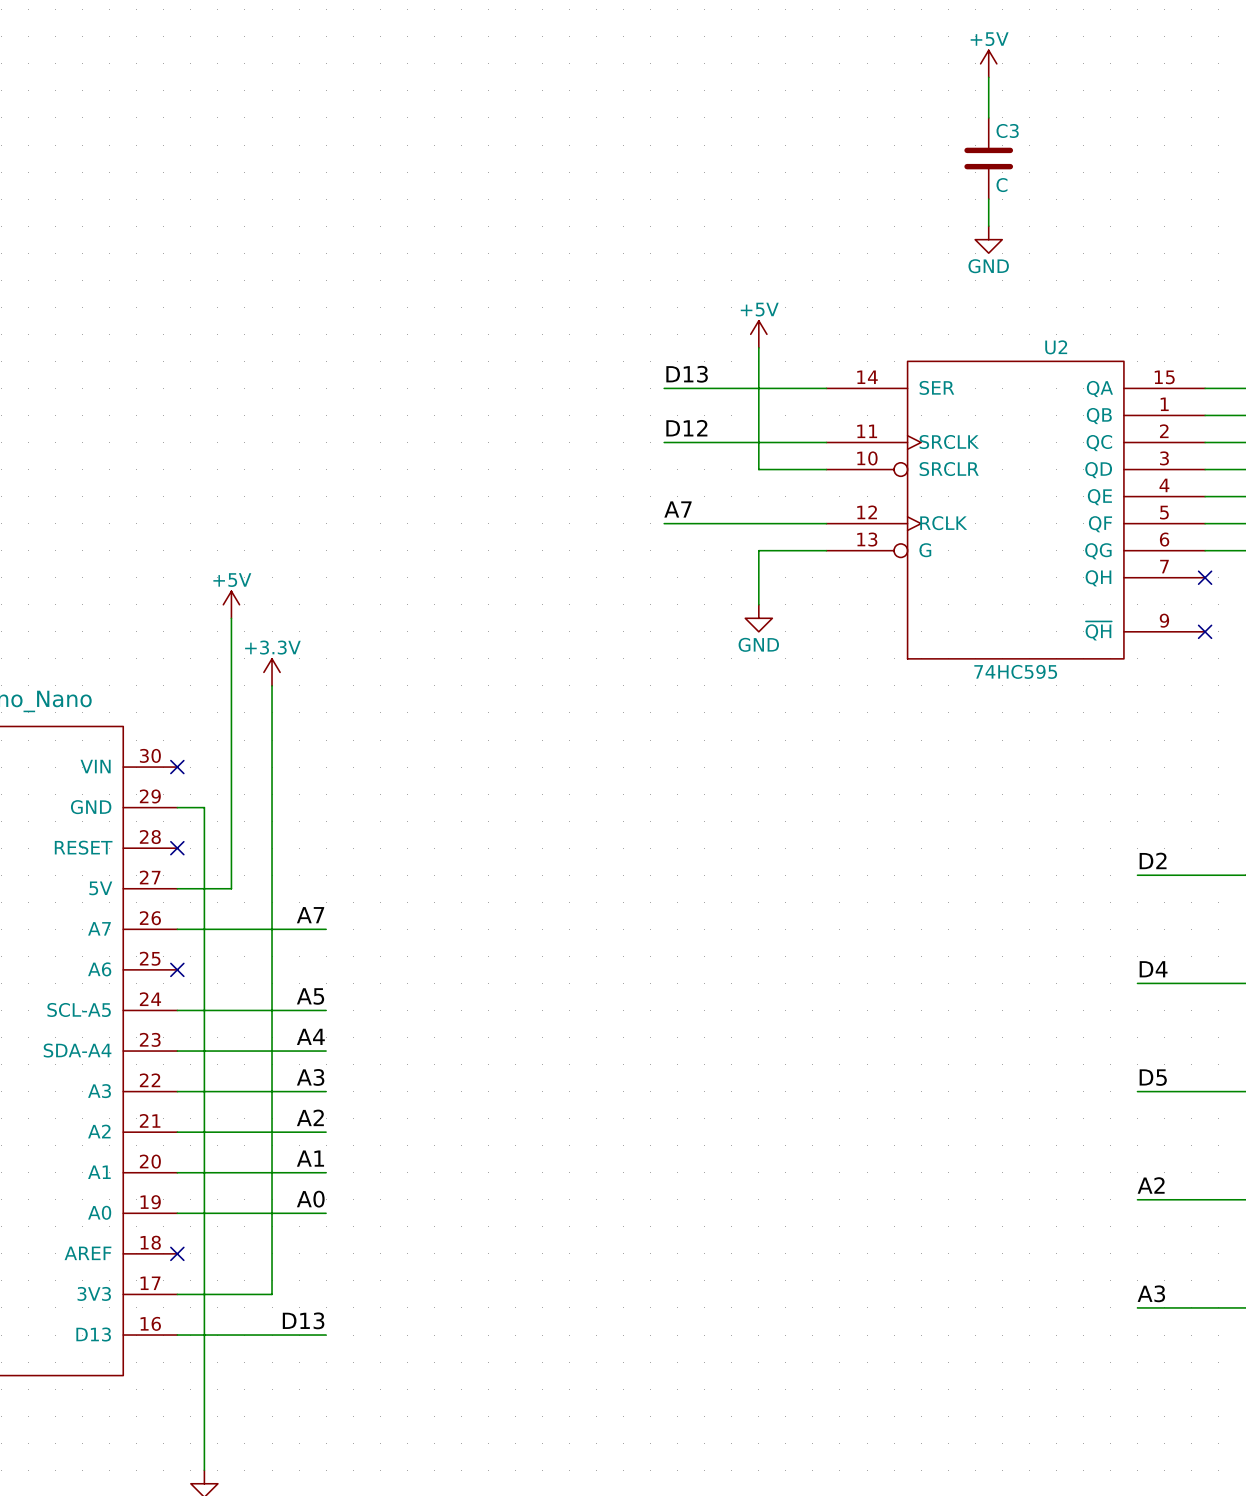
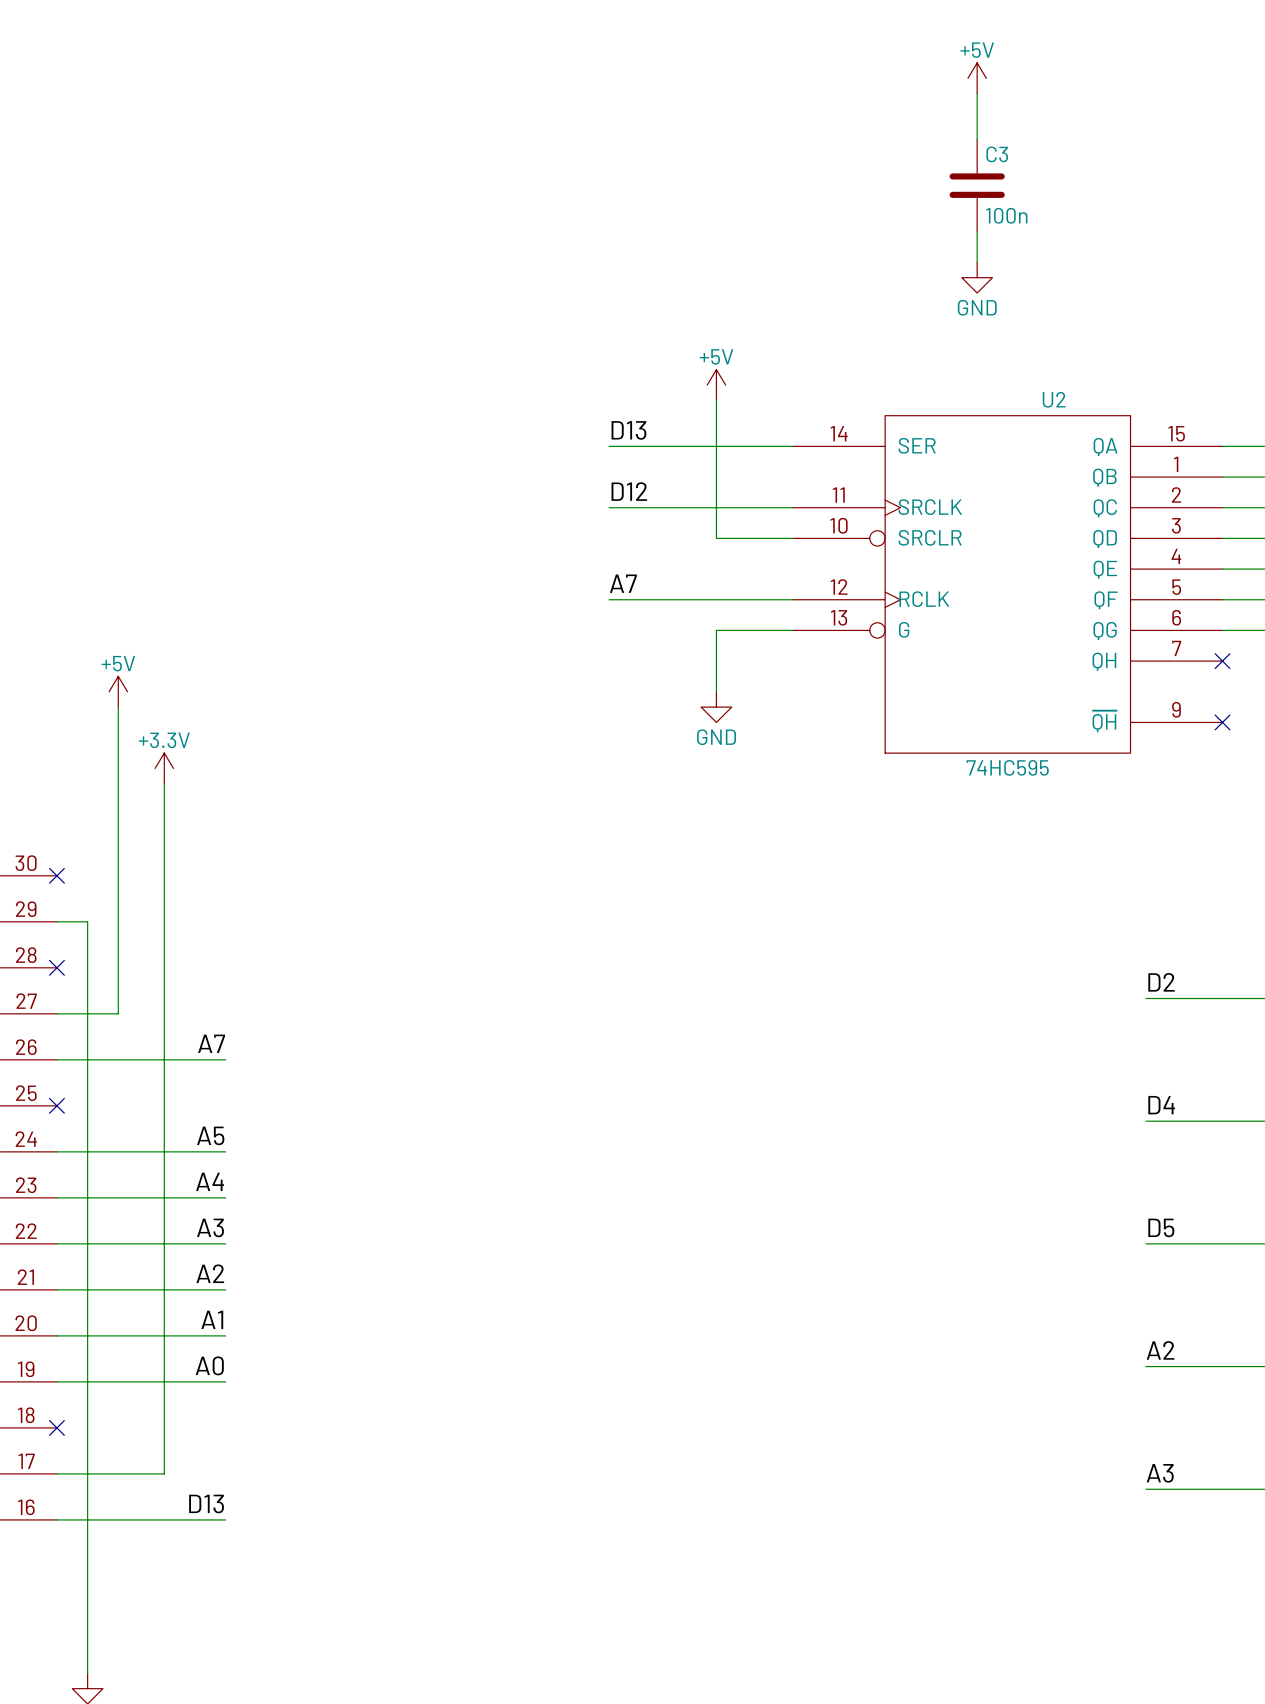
C3 value: C (1001, 185) -> 100n (1006, 215)

